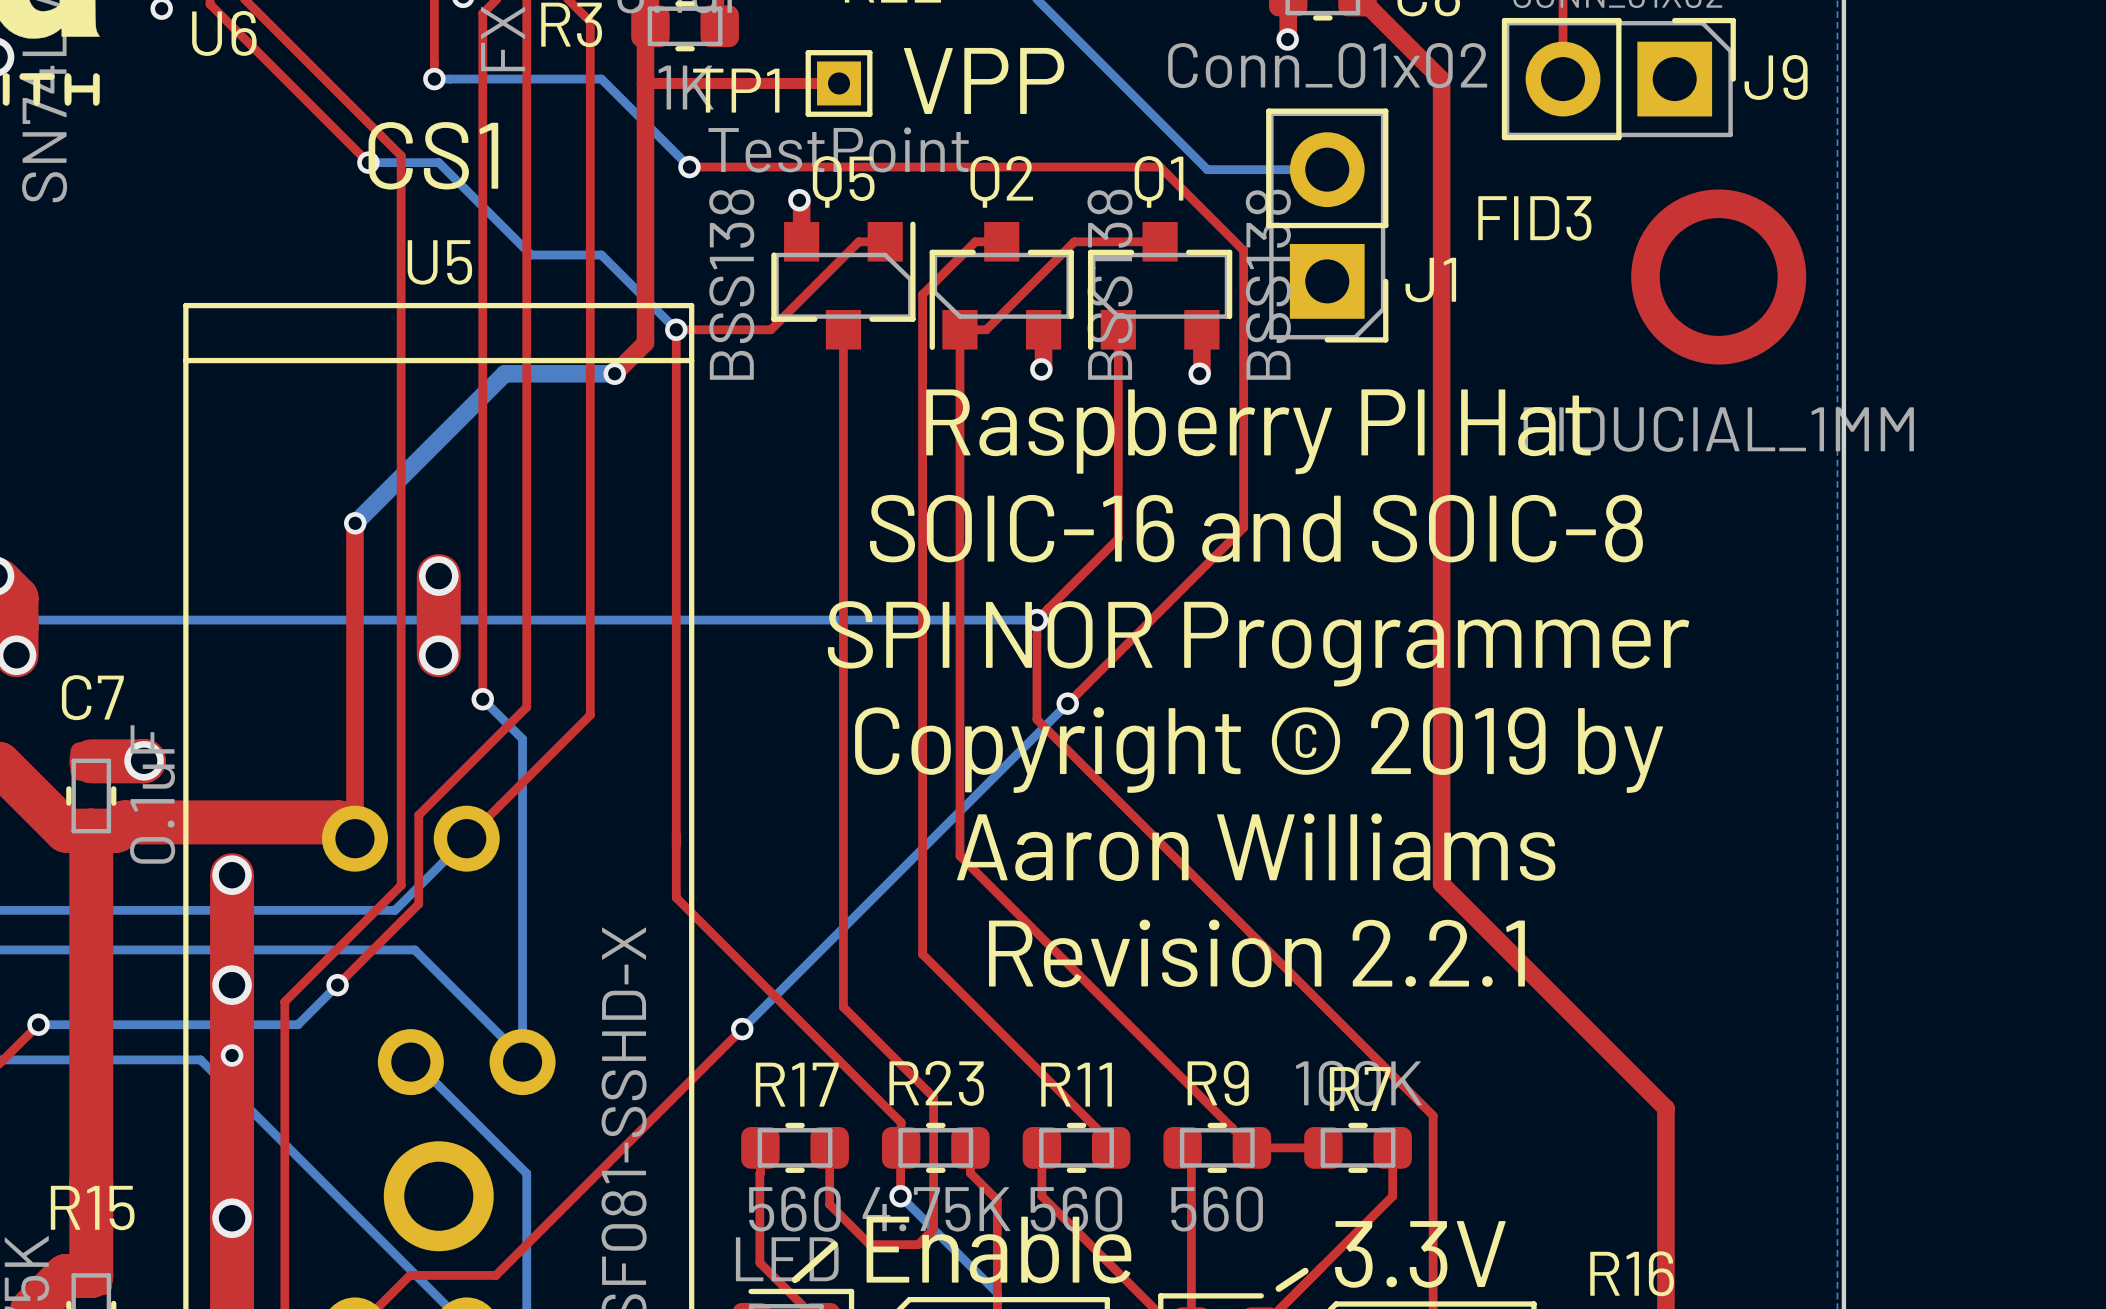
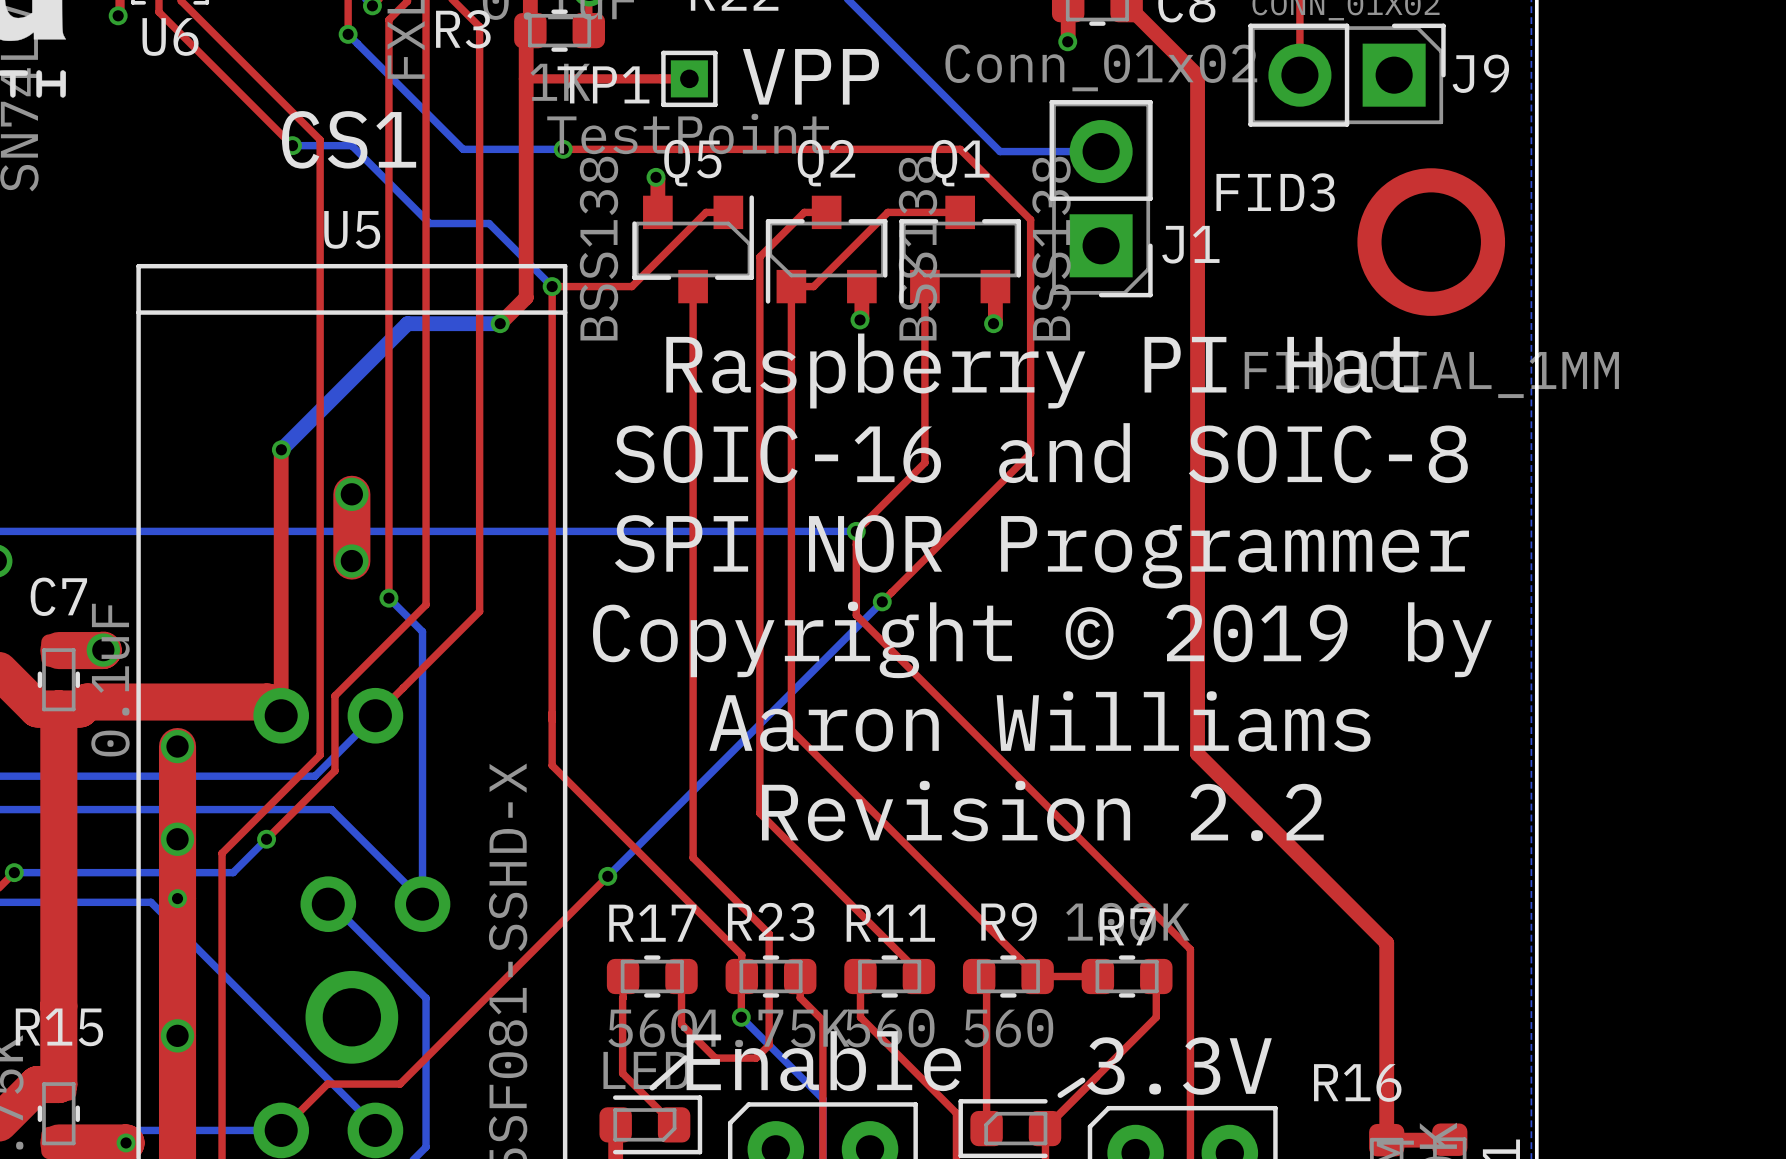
top track: (434, 30) (434, 79) -> none
bottom track: (434, 79) (601, 79) (689, 167) -> (348, 34) (463, 149) (563, 149)
via position: (434, 79) -> (348, 34)
text: Revision 2.2.1 (1256, 953) -> Revision 2.2 (1042, 811)

